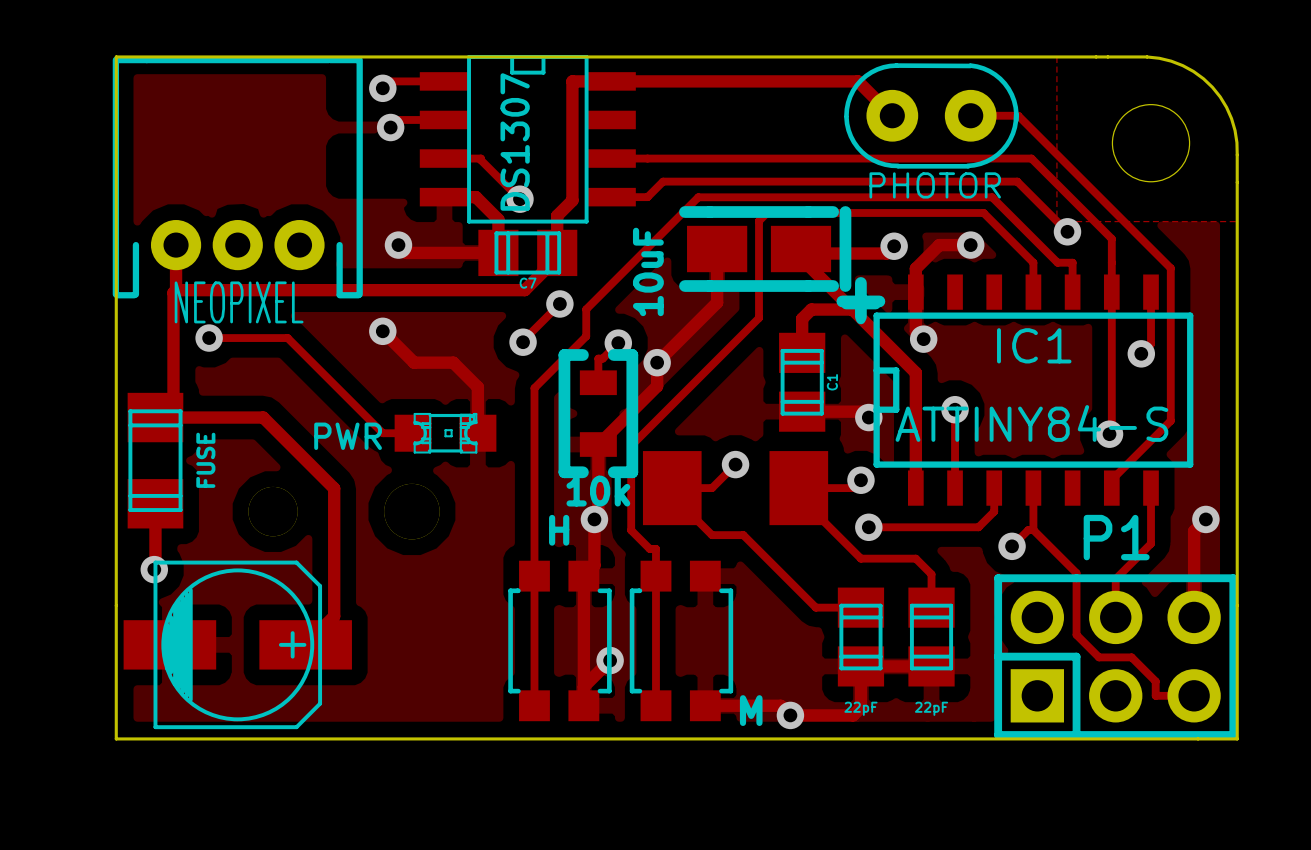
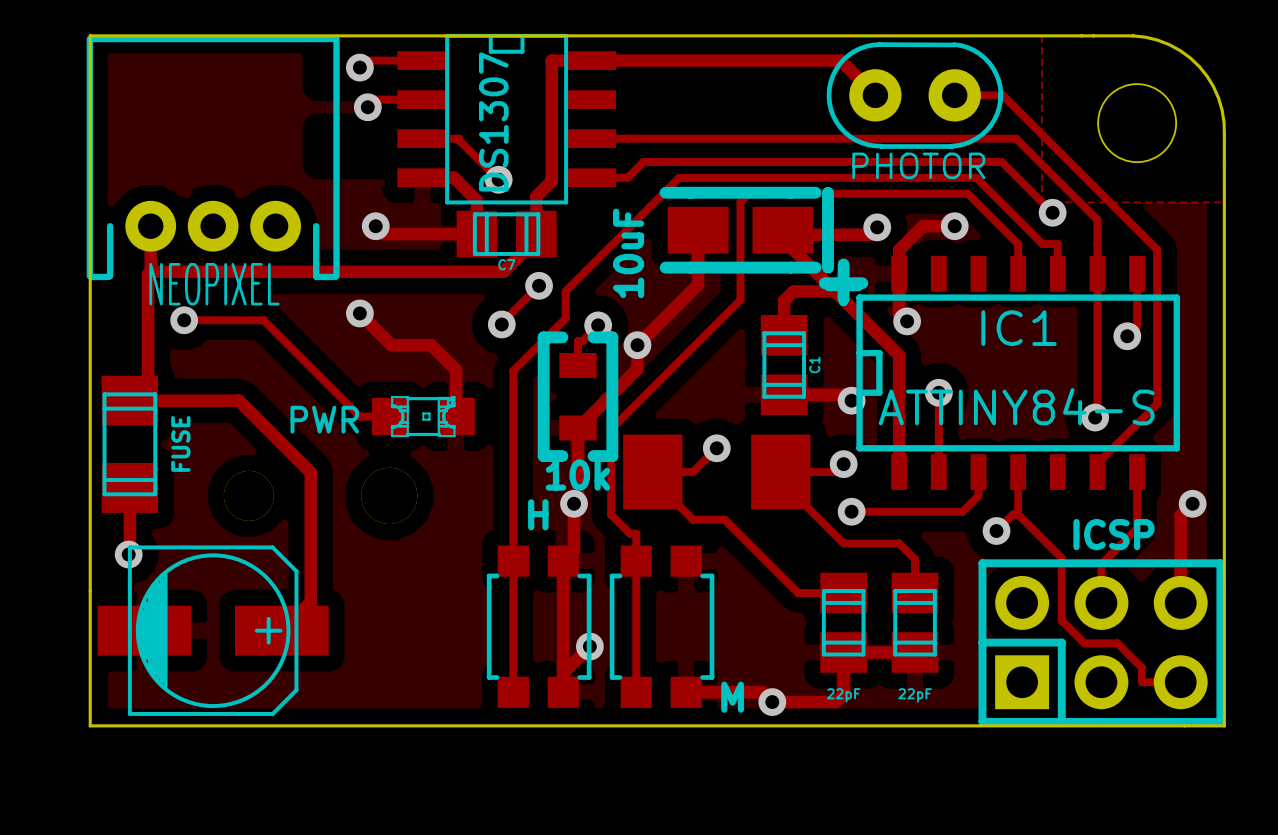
P1 name: P1 (1116, 537) -> none
P1 value: none -> ICSP (1113, 534)

